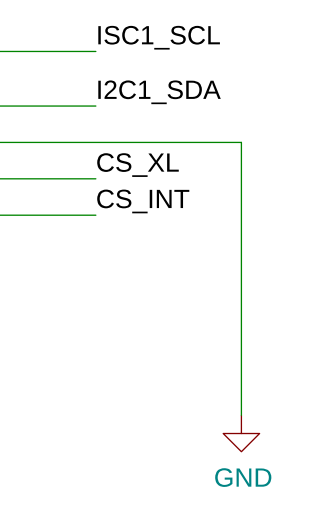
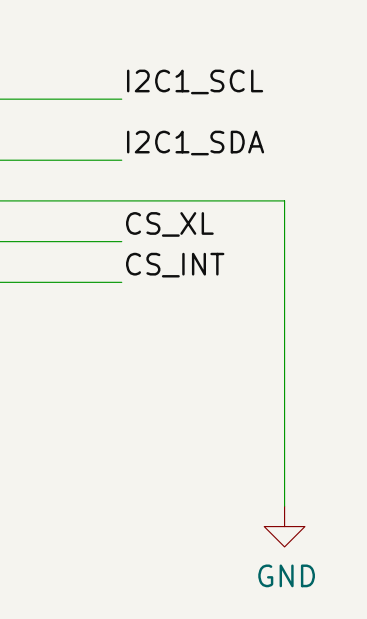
label: ISC1_SCL (159, 37) -> I2C1_SCL (195, 81)

